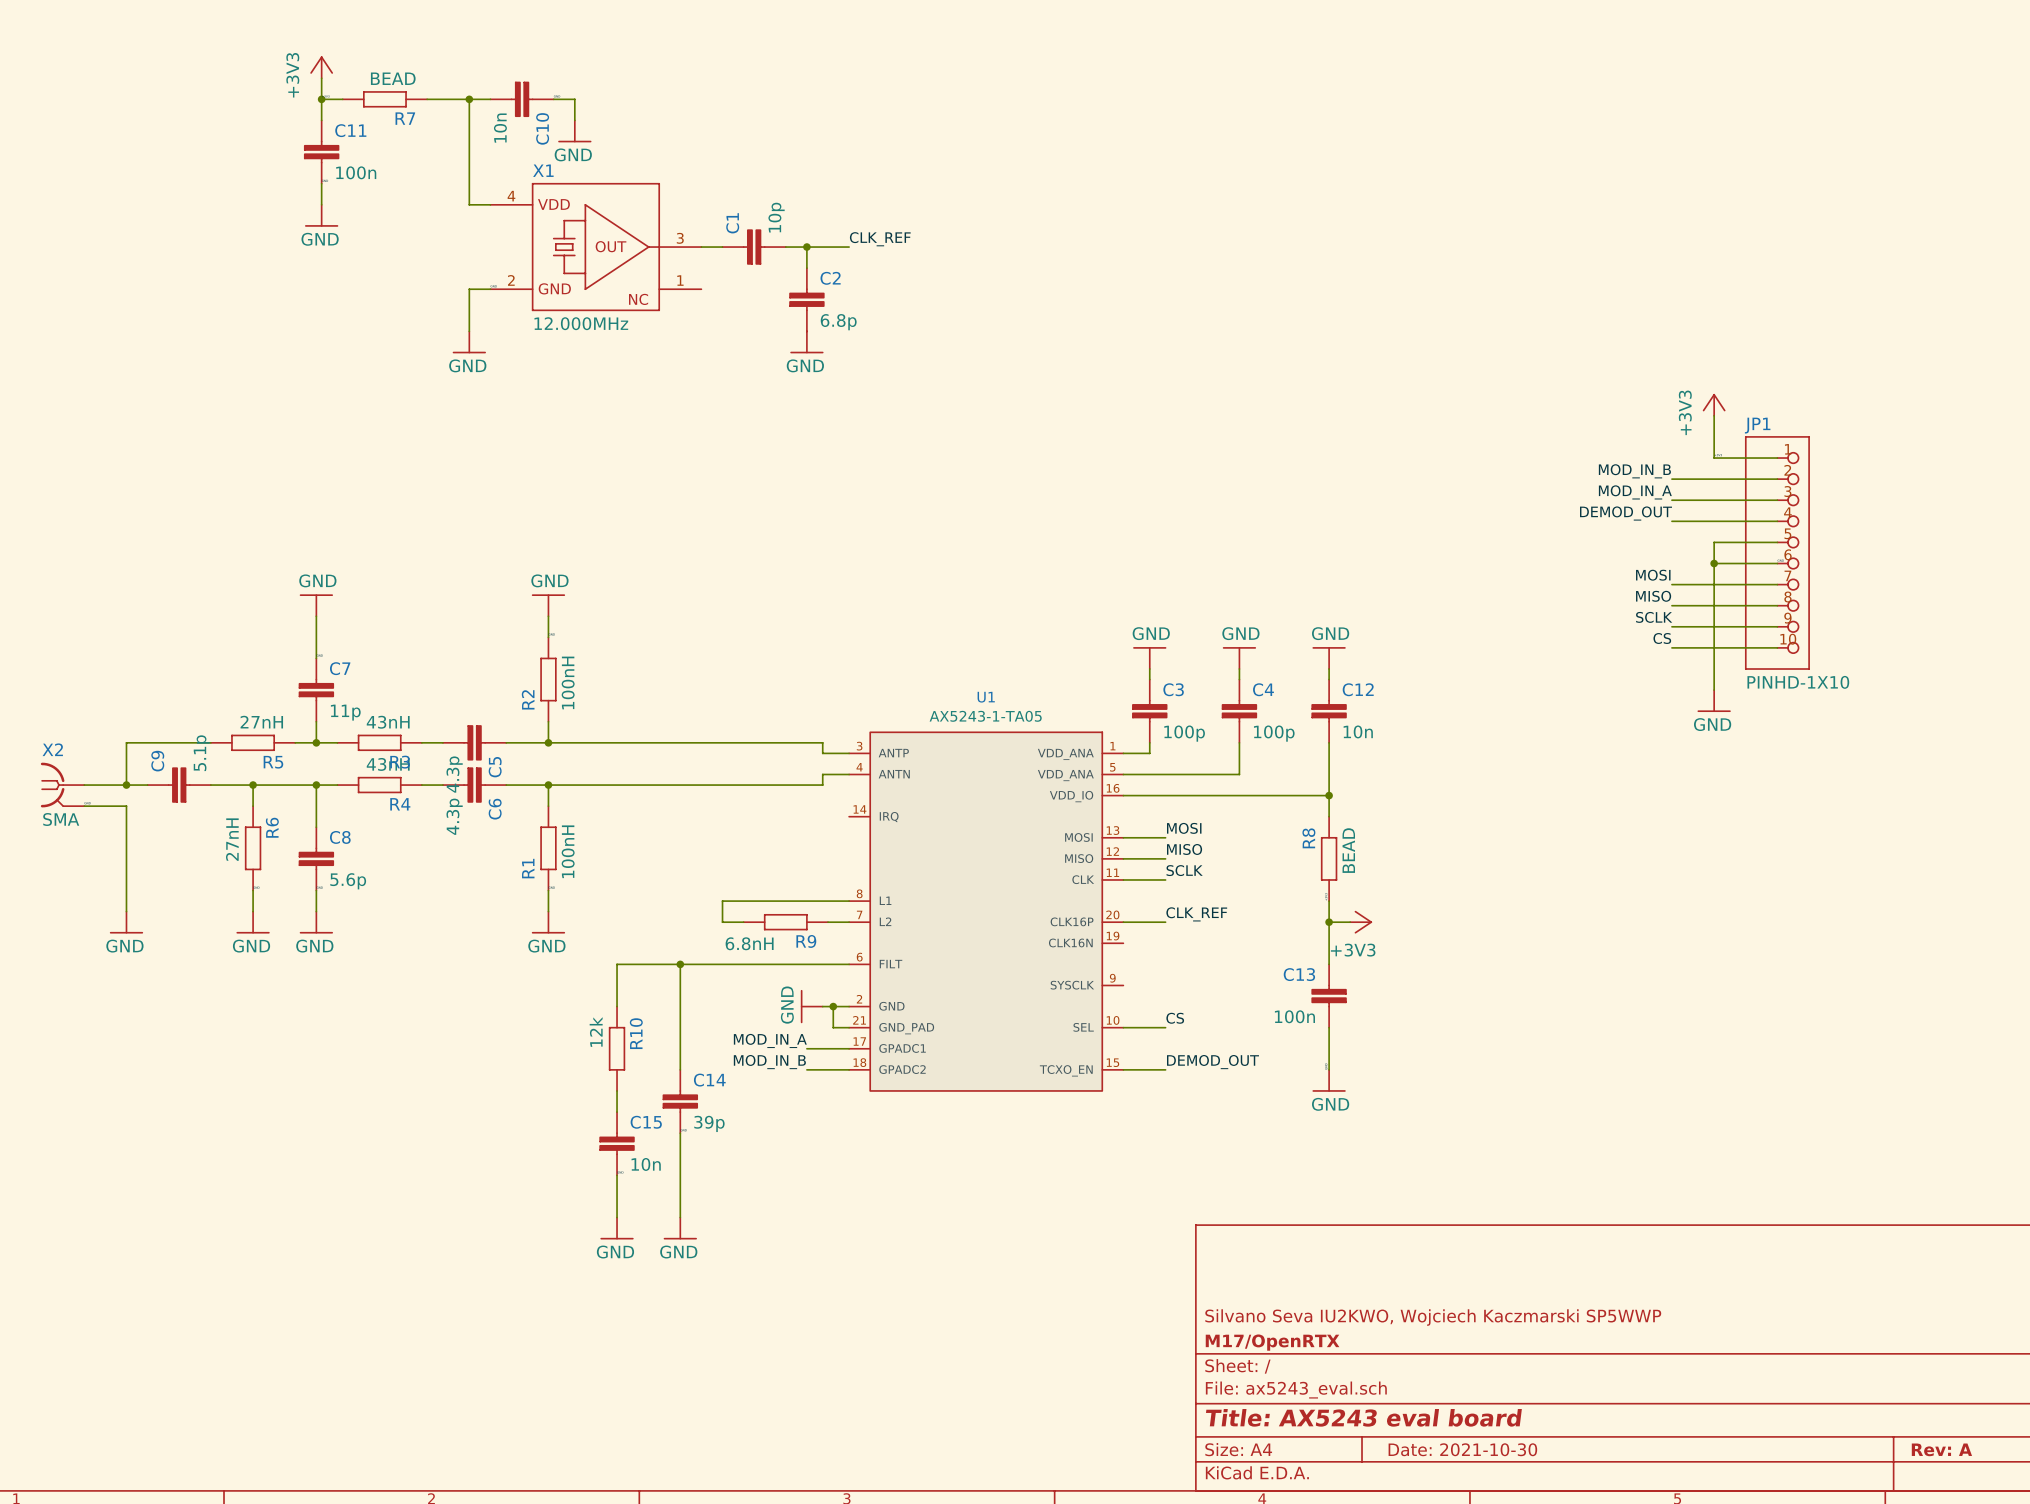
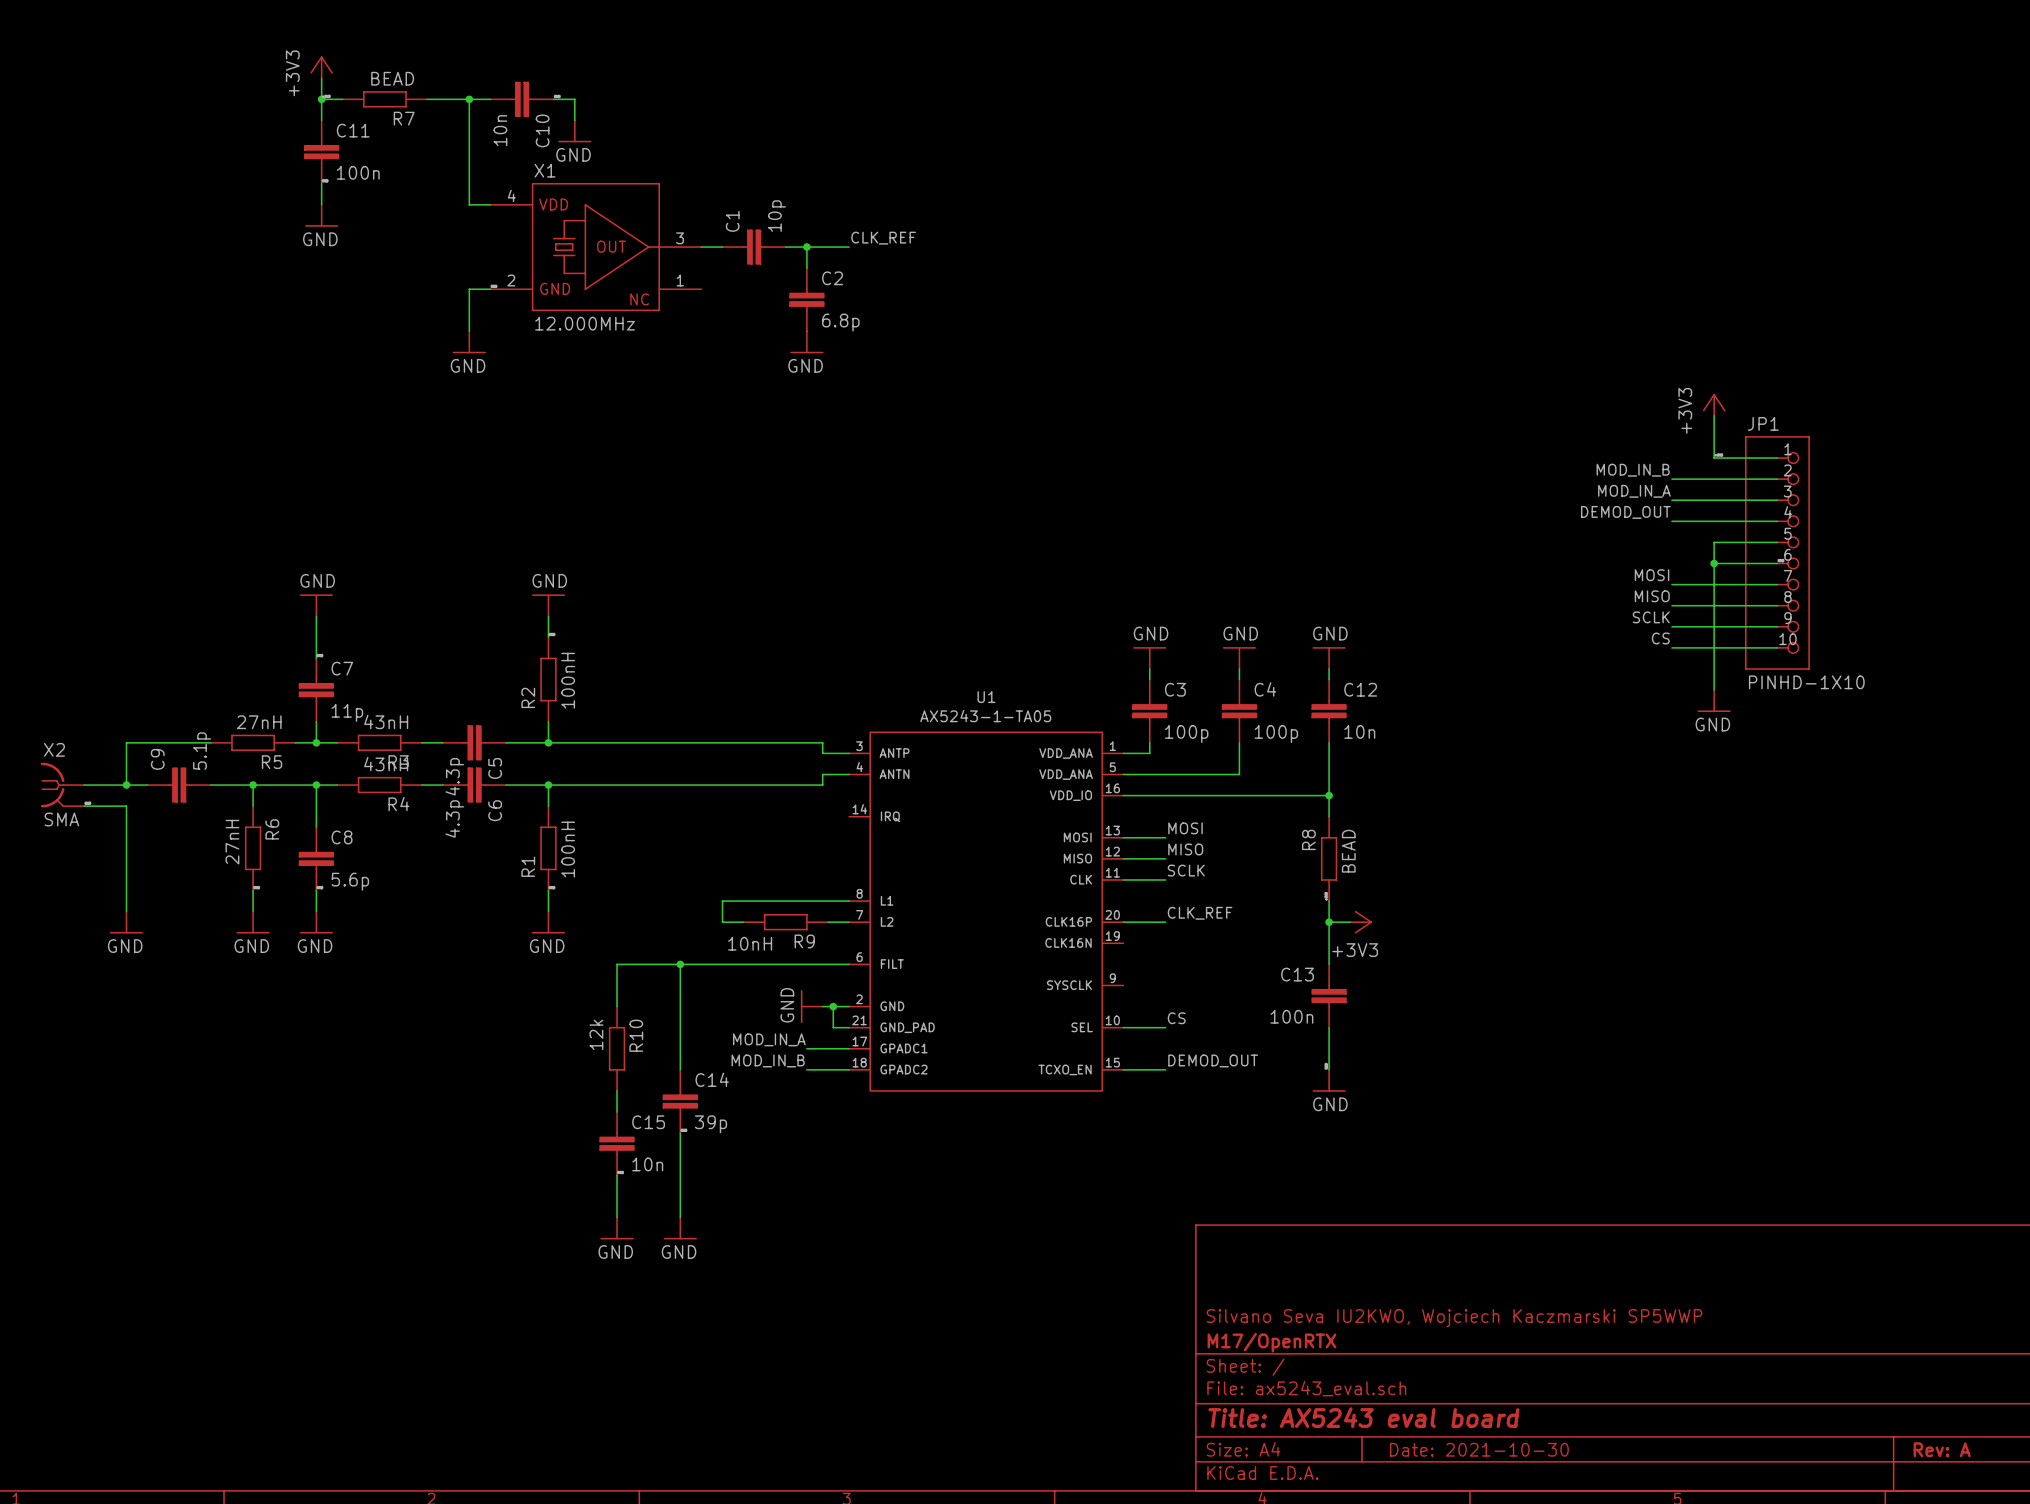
R9 value: 6.8nH (749, 943) -> 10nH (750, 943)

